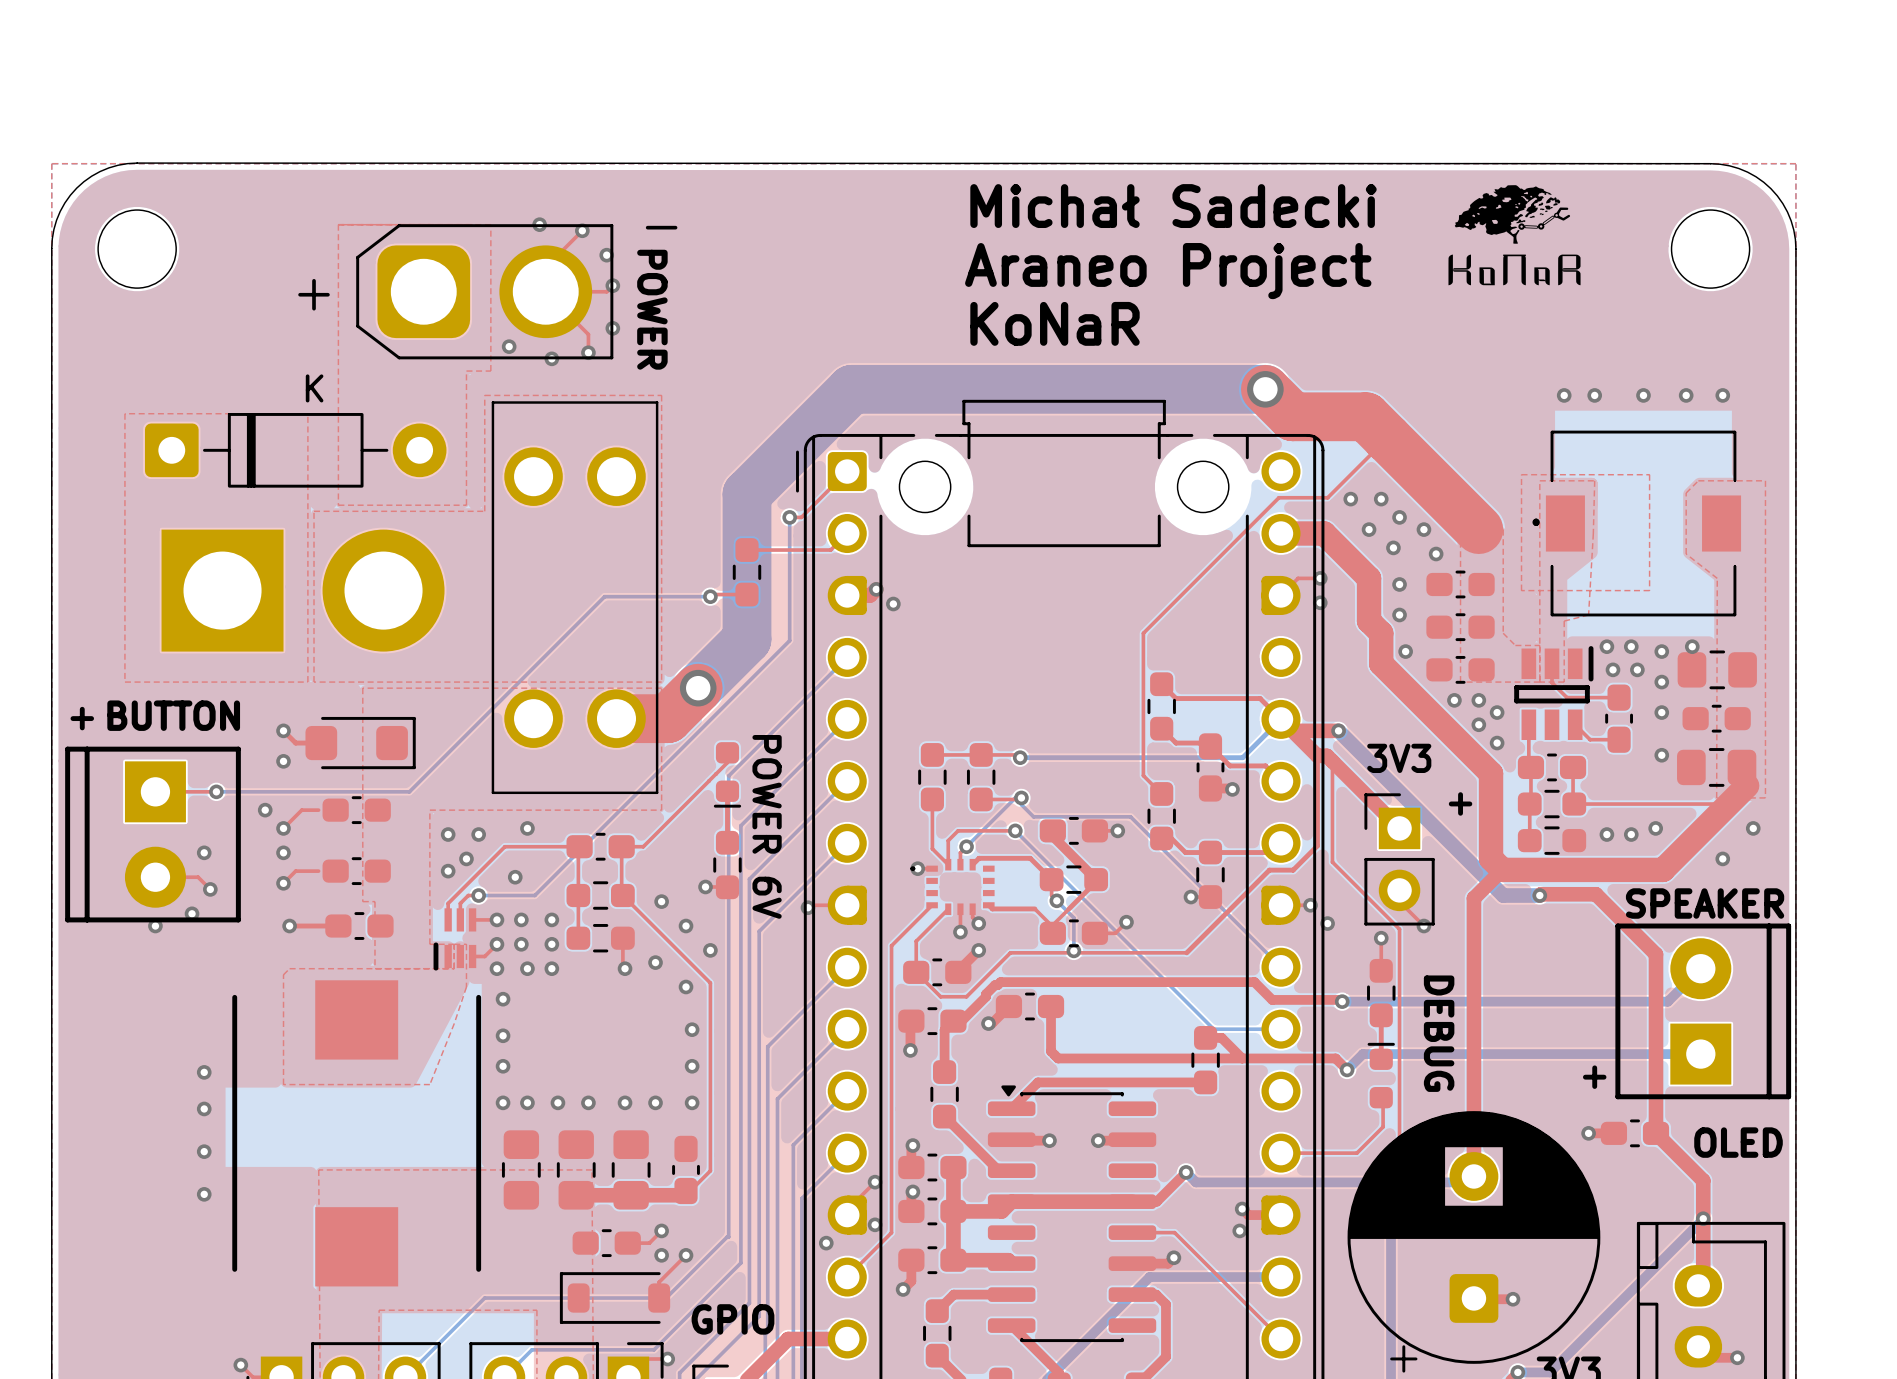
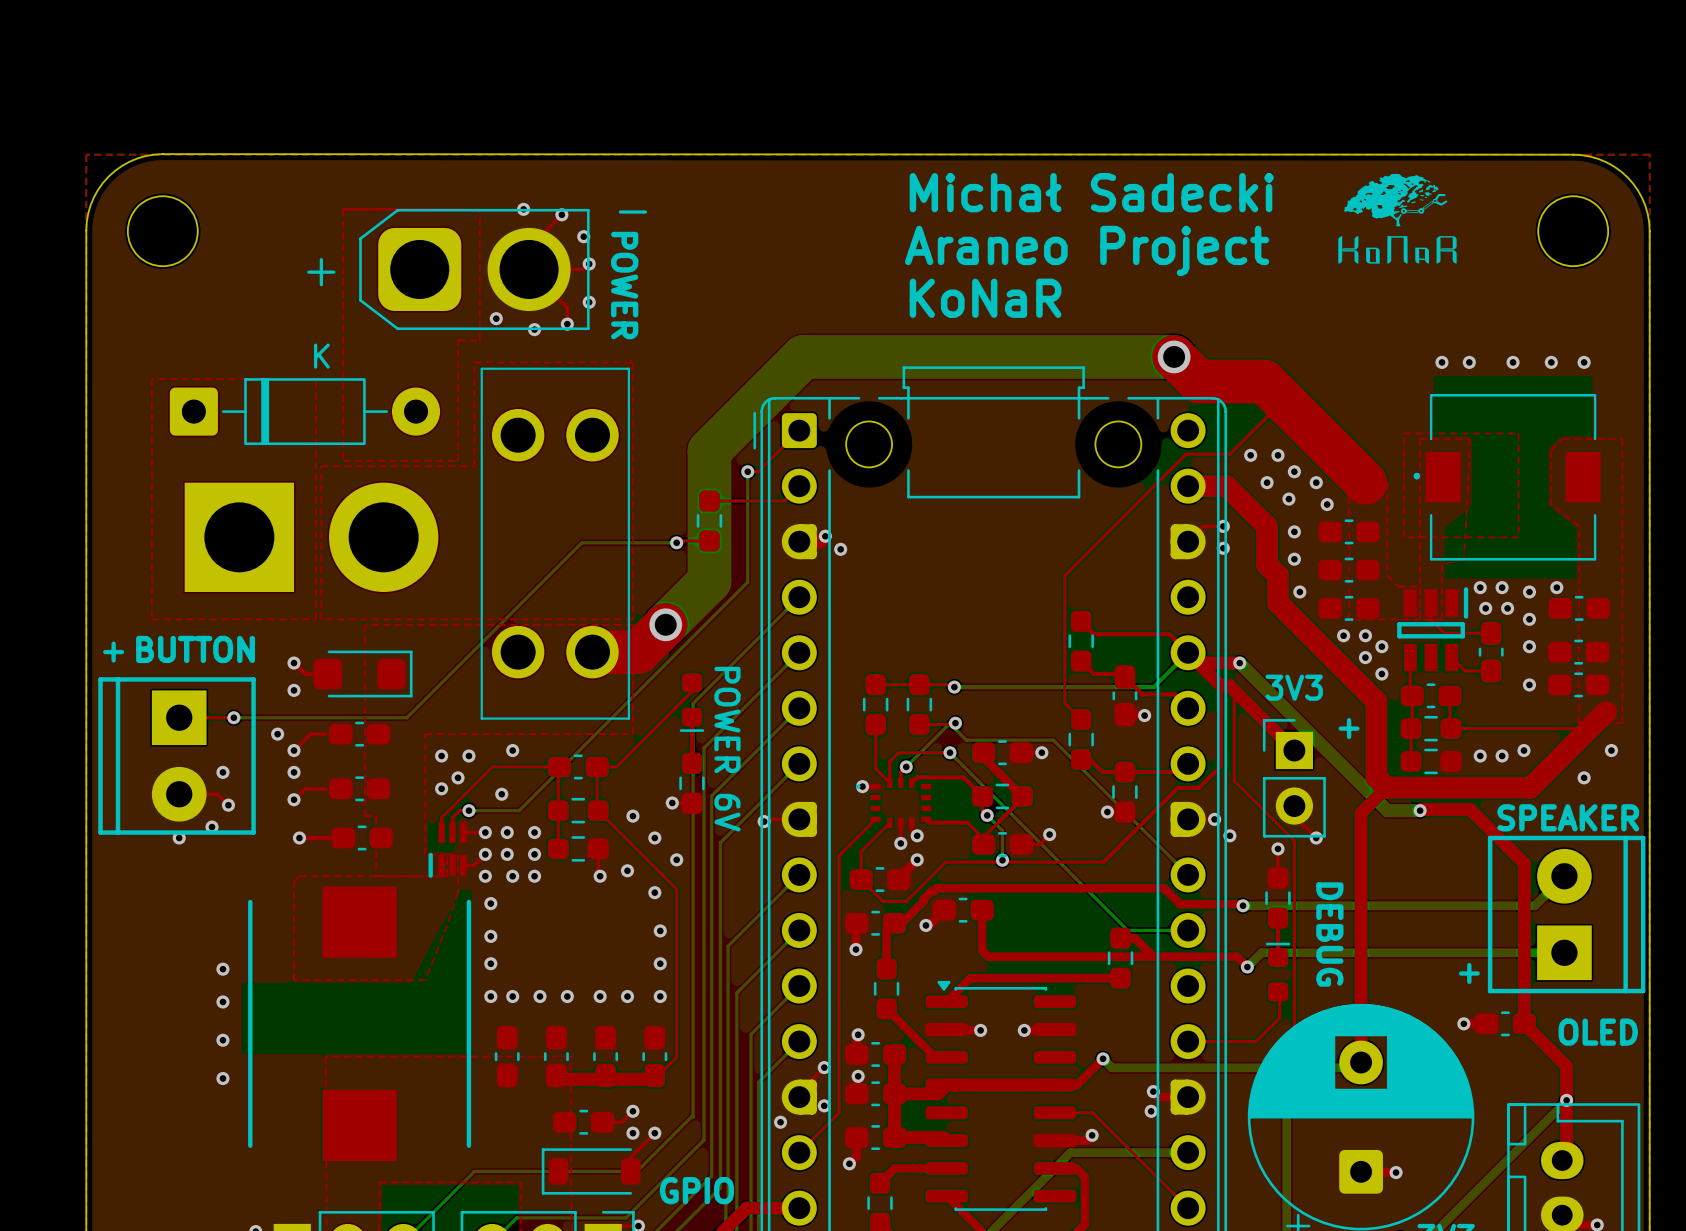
part footprint: [1677, 650, 1757, 690] -> [1548, 595, 1610, 621]
part footprint: [1677, 748, 1757, 787] -> [1548, 672, 1610, 698]
part footprint: [501, 1130, 541, 1210] -> [494, 1026, 520, 1088]
part footprint: [556, 1130, 596, 1210] -> [543, 1026, 569, 1088]
part footprint: [611, 1130, 651, 1210] -> [593, 1026, 619, 1088]

